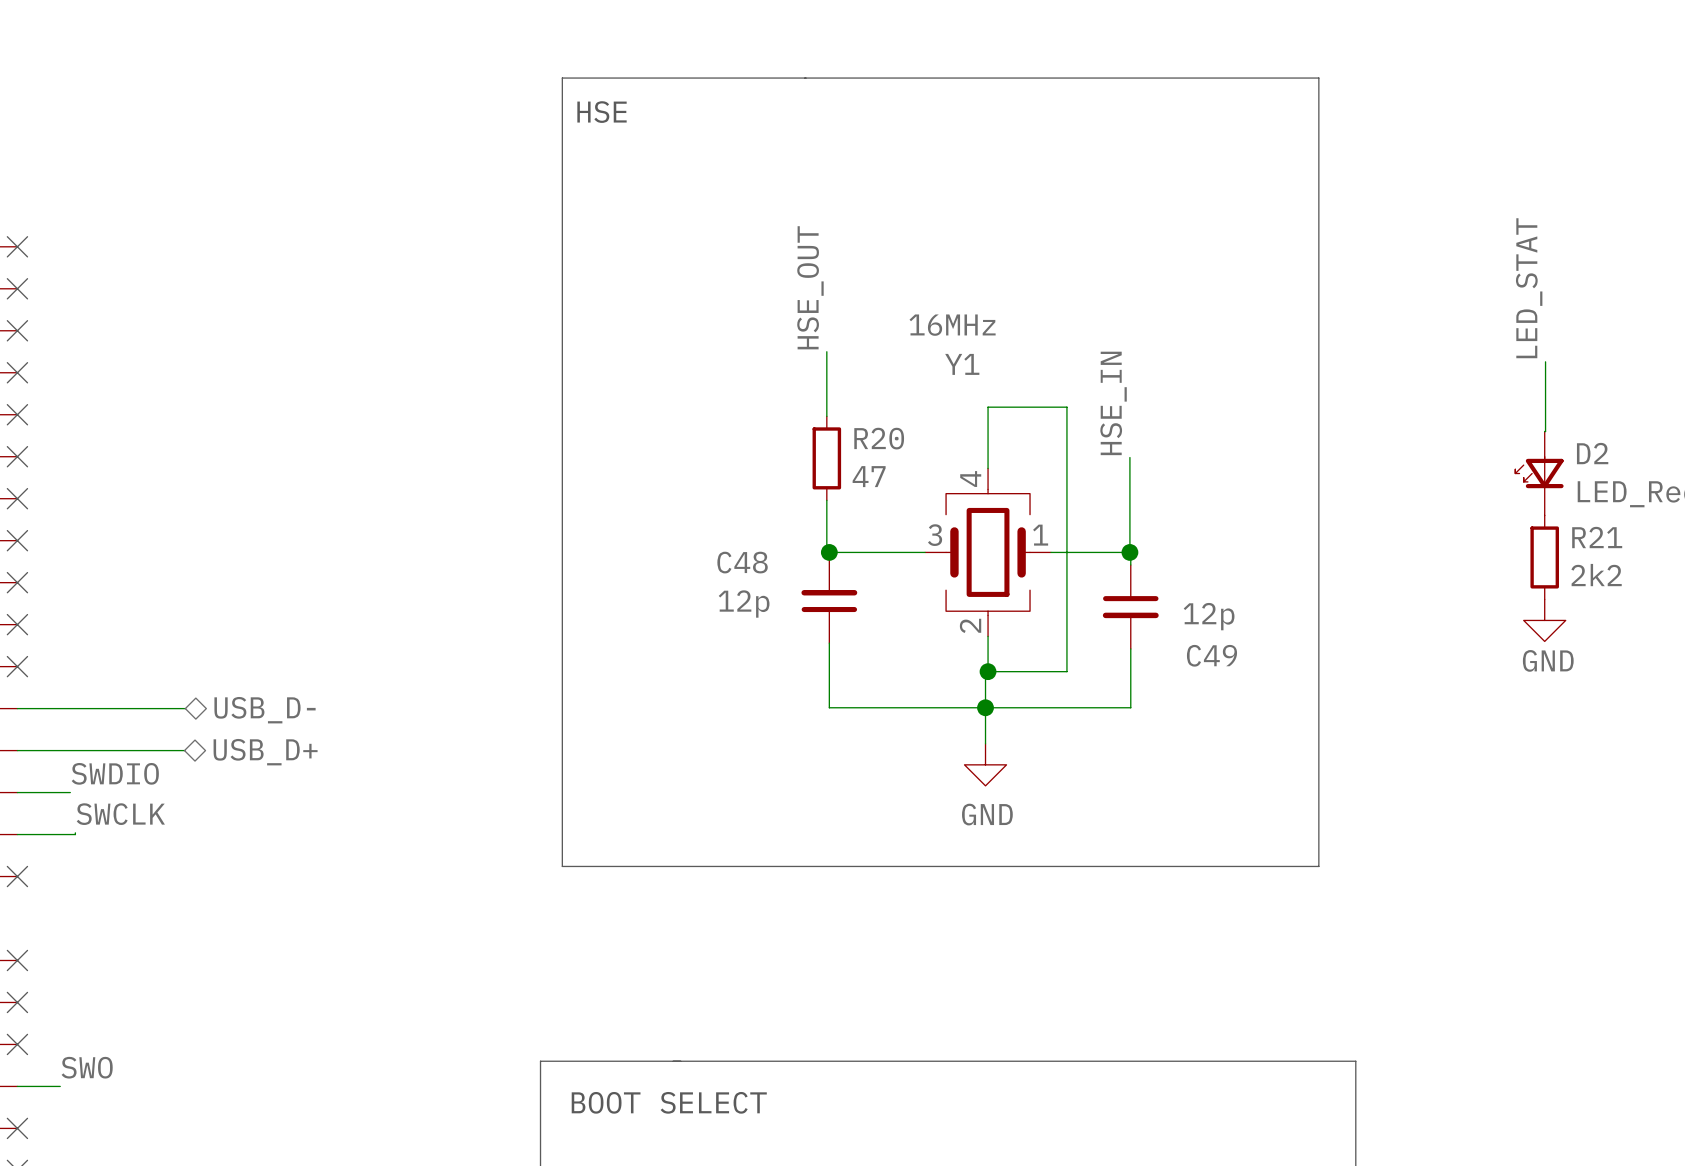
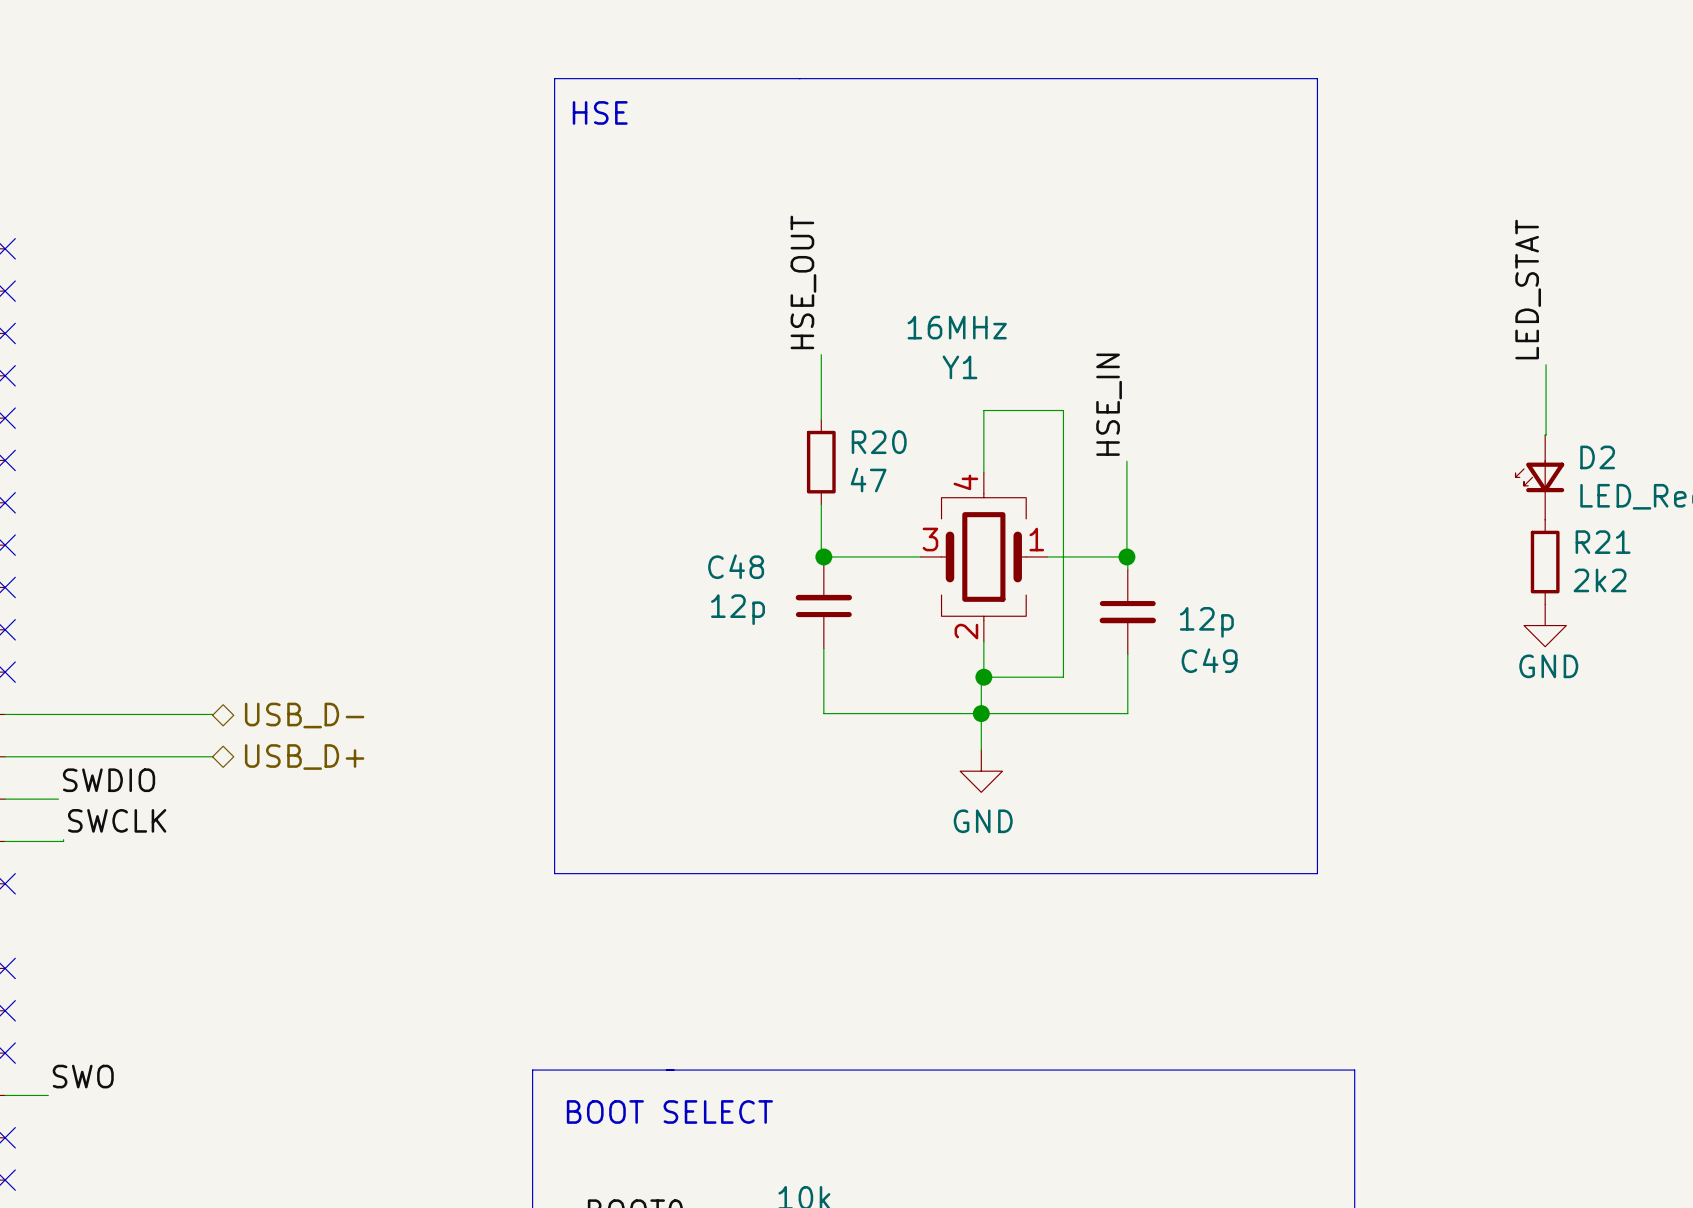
wire: none -> (174, 714) (212, 715)
hierarchical label position: USB_D- (265, 710) -> USB_D- (304, 715)
wire: none -> (173, 756) (212, 756)
hierarchical label position: USB_D+ (265, 752) -> USB_D+ (304, 757)

